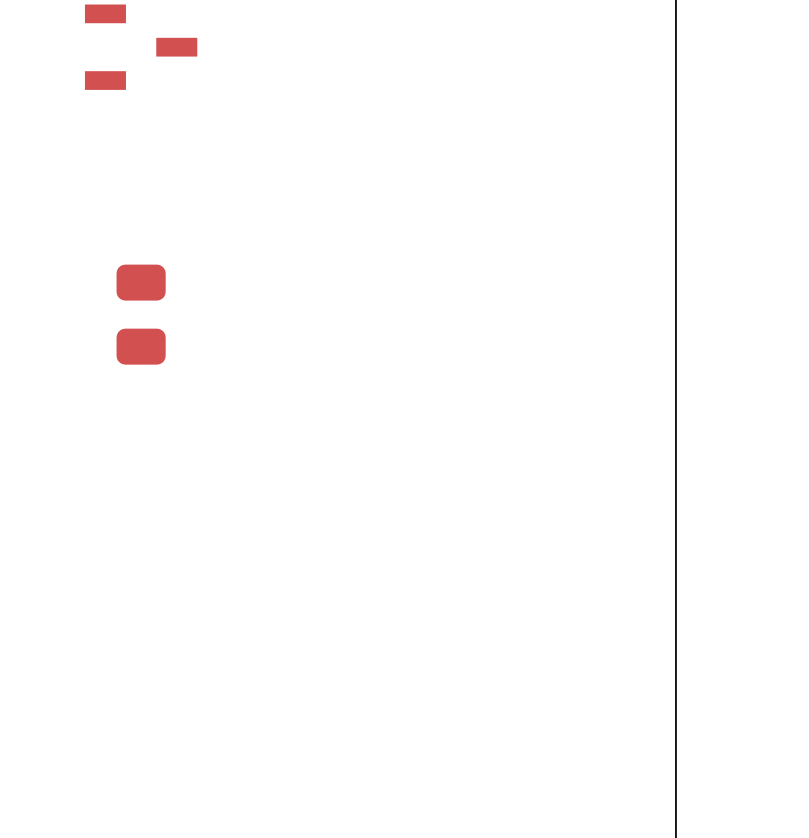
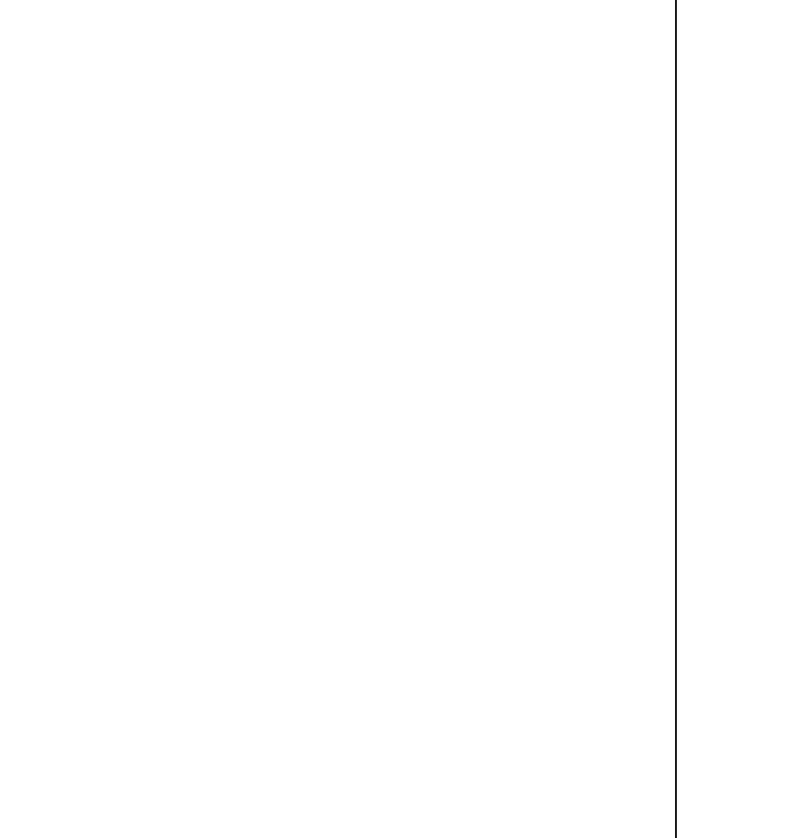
part: (141, 47) -> none
part: (141, 314) -> none

